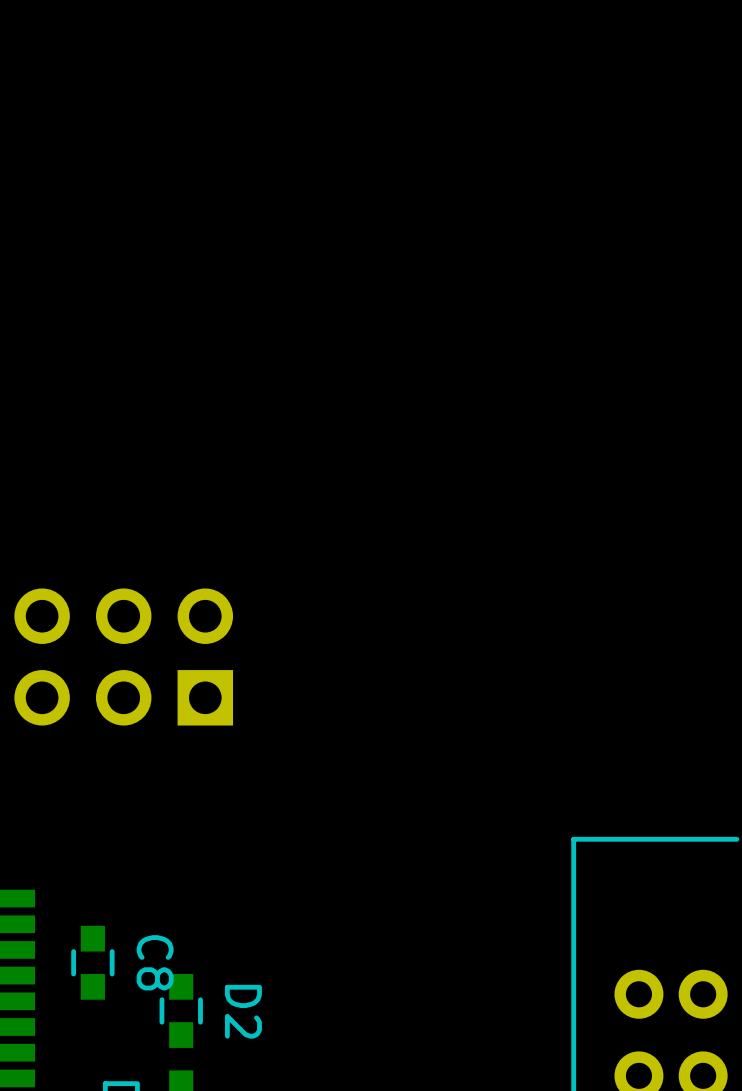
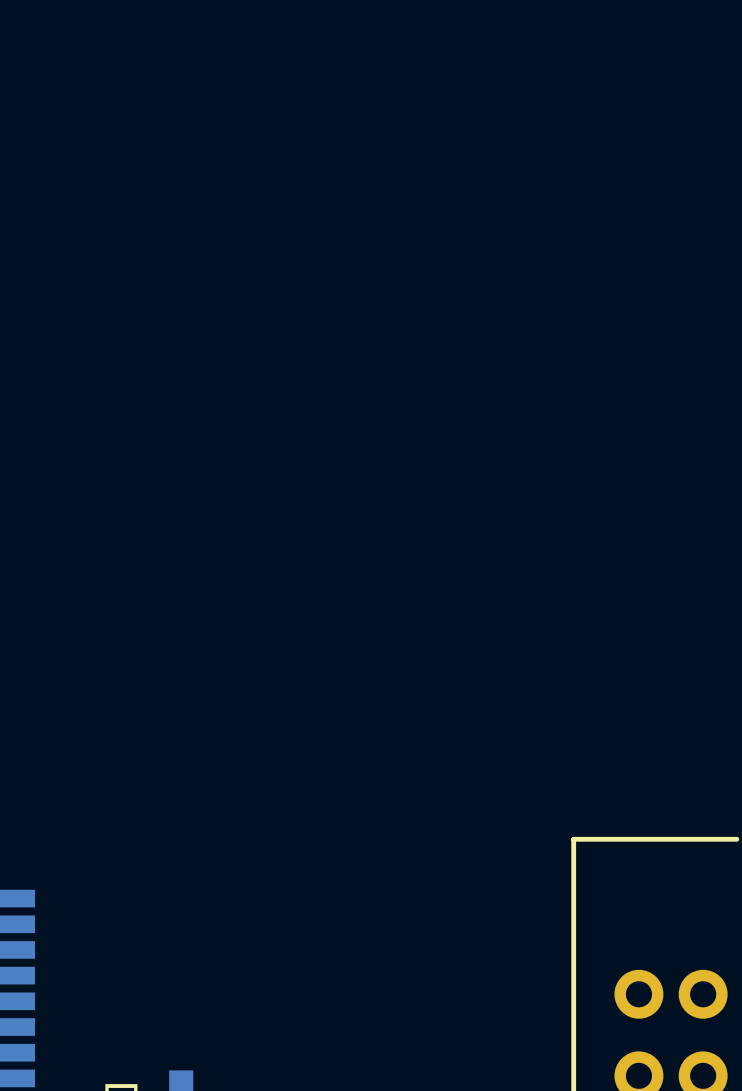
part: (123, 657) -> none
C8: (92, 962) -> none
D2: (181, 1010) -> none

